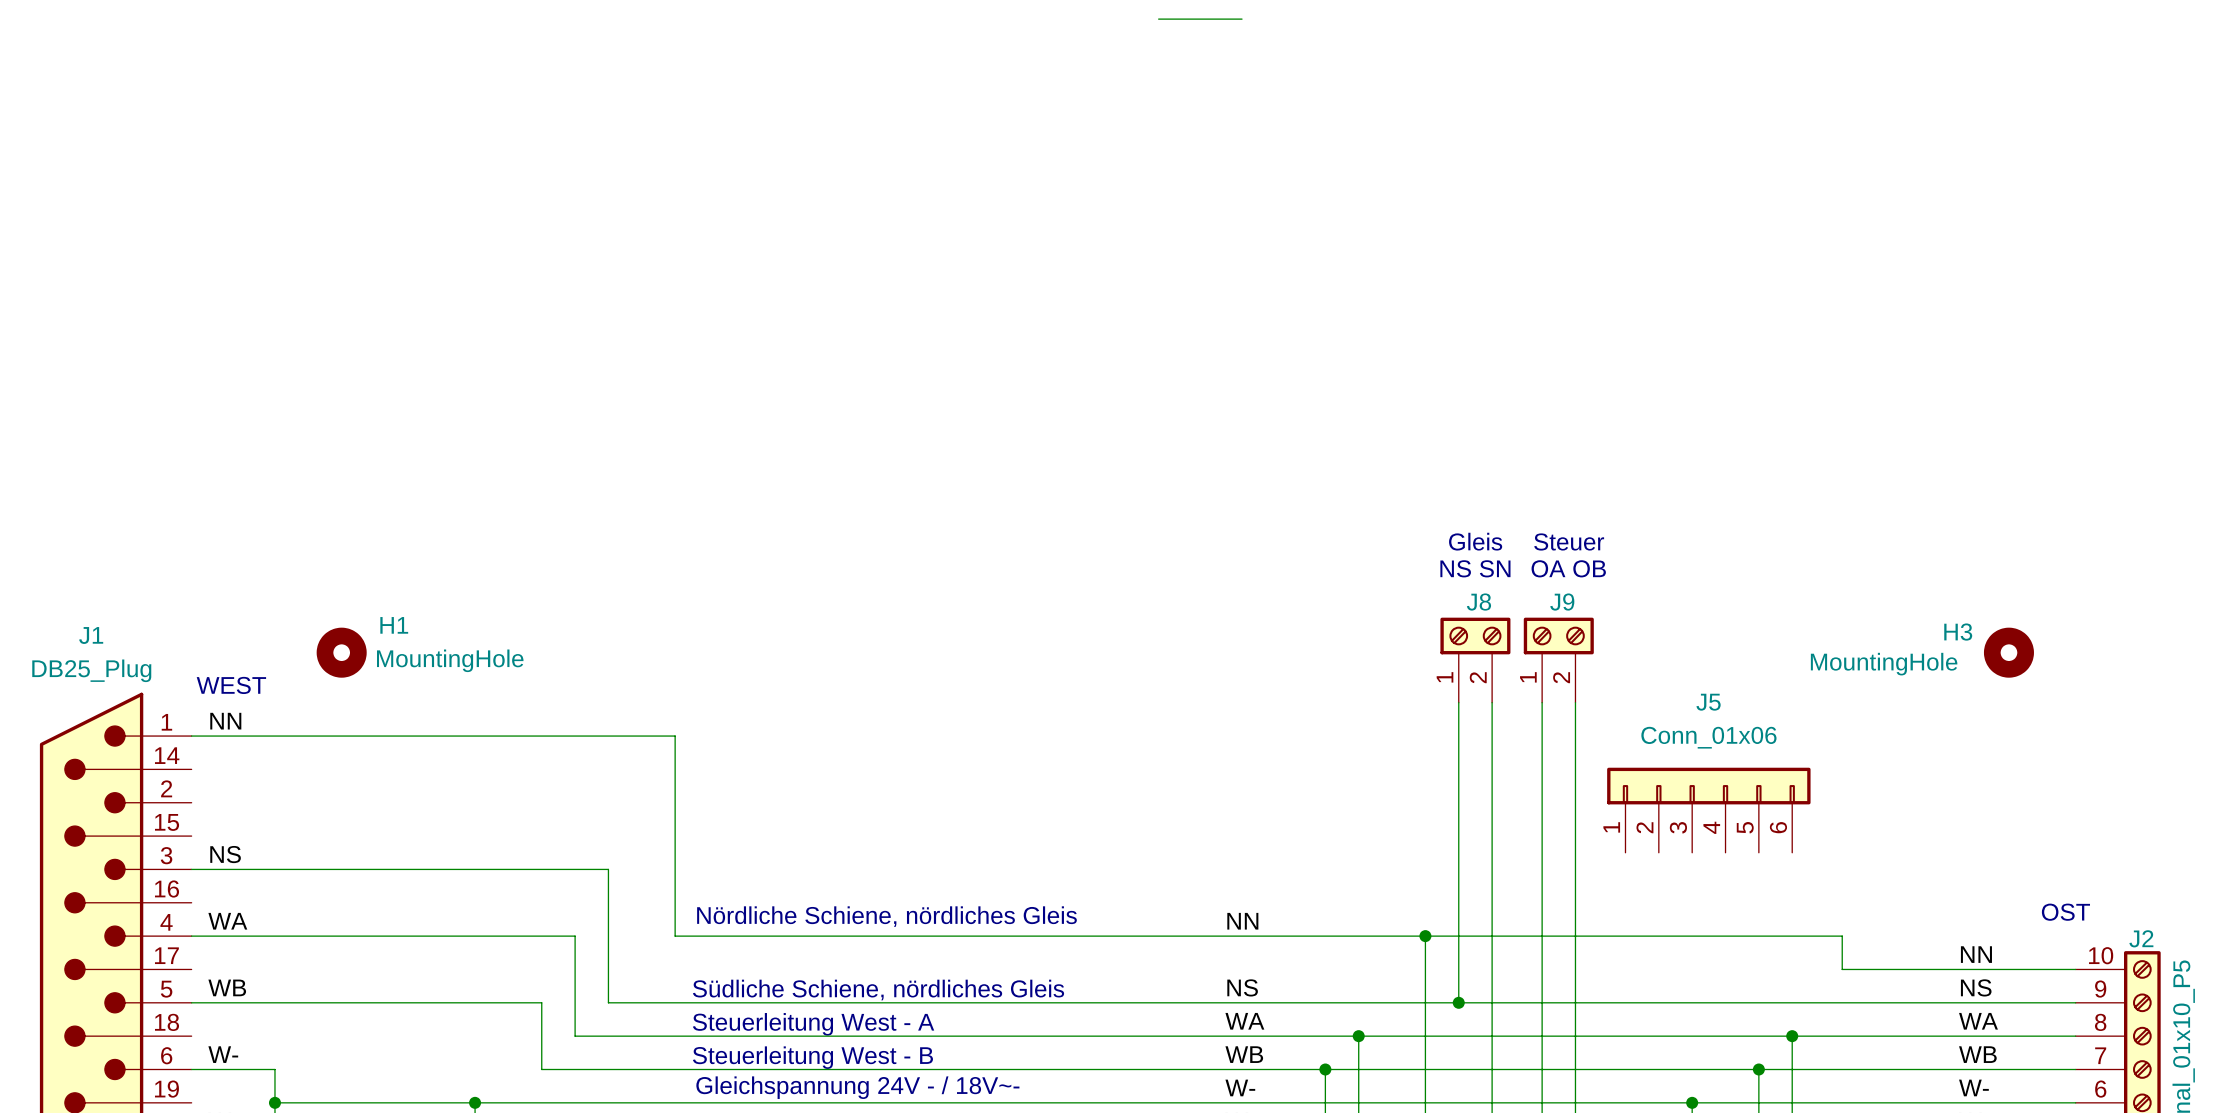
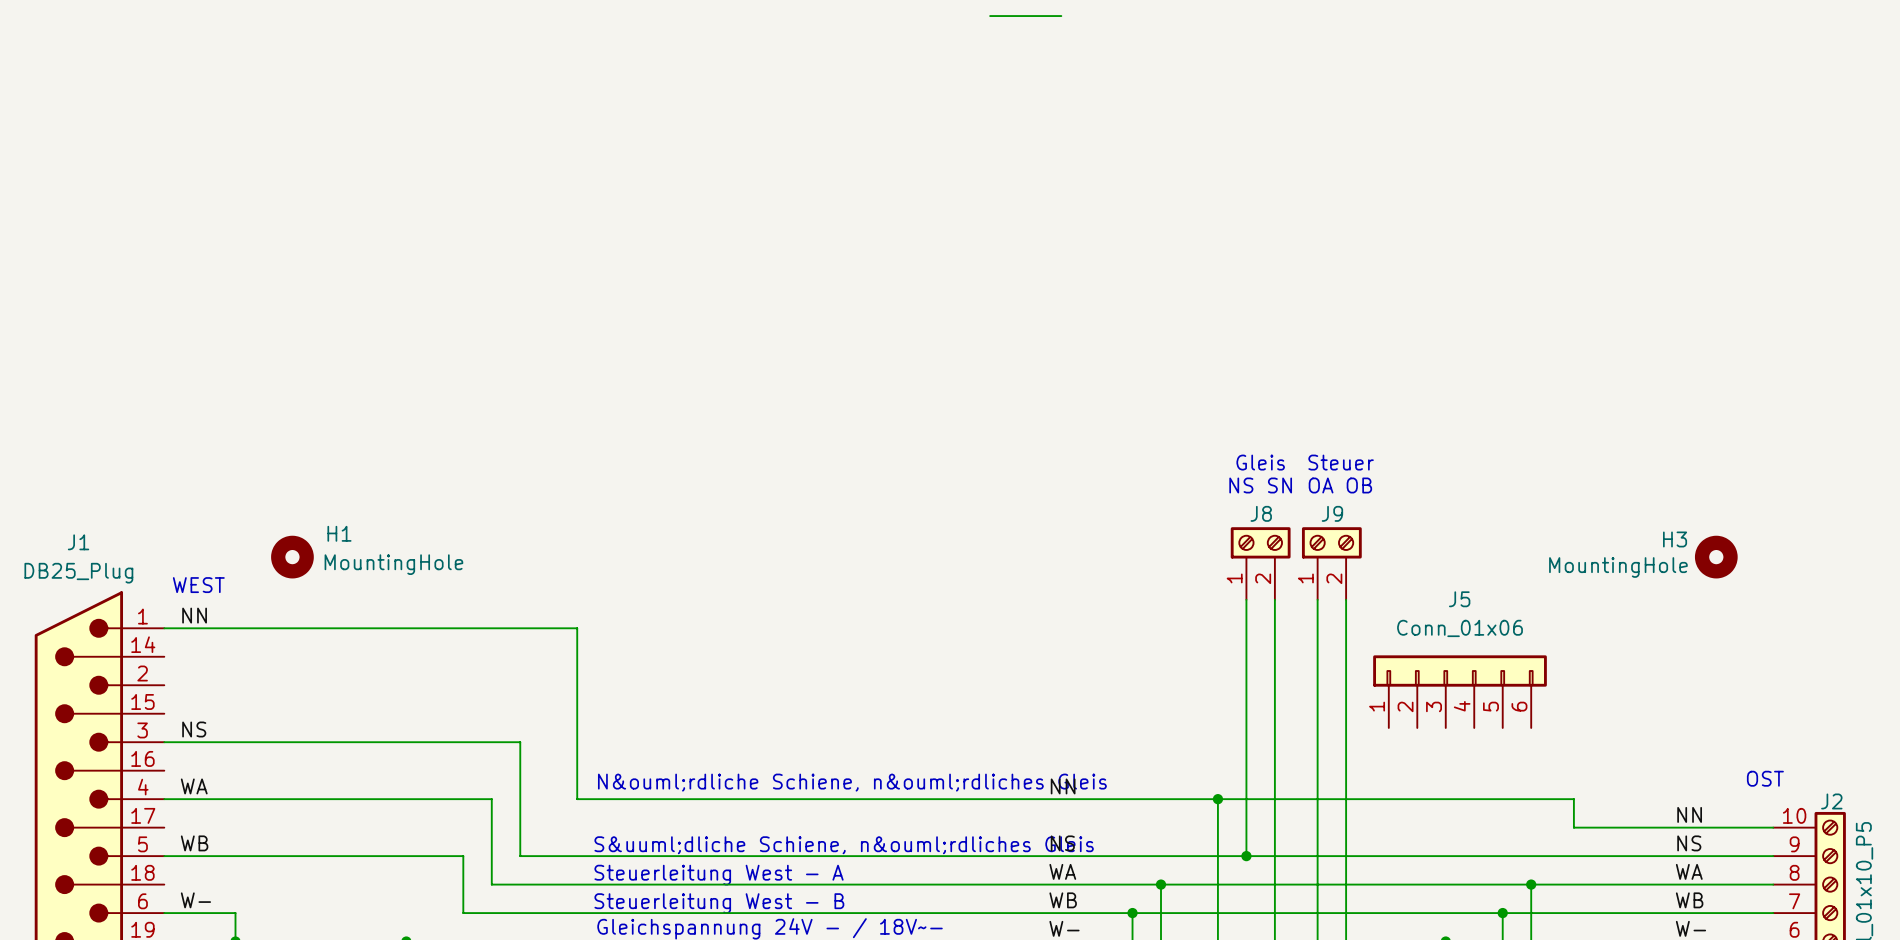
text: Nördliche Schiene, nördliches Gleis (886, 916) -> N&ouml;rdliche Schiene, n&ouml;rdliches Gleis (852, 782)
text: Südliche Schiene, nördliches Gleis (878, 990) -> S&uuml;dliche Schiene, n&ouml;rdliches Gleis (844, 845)

